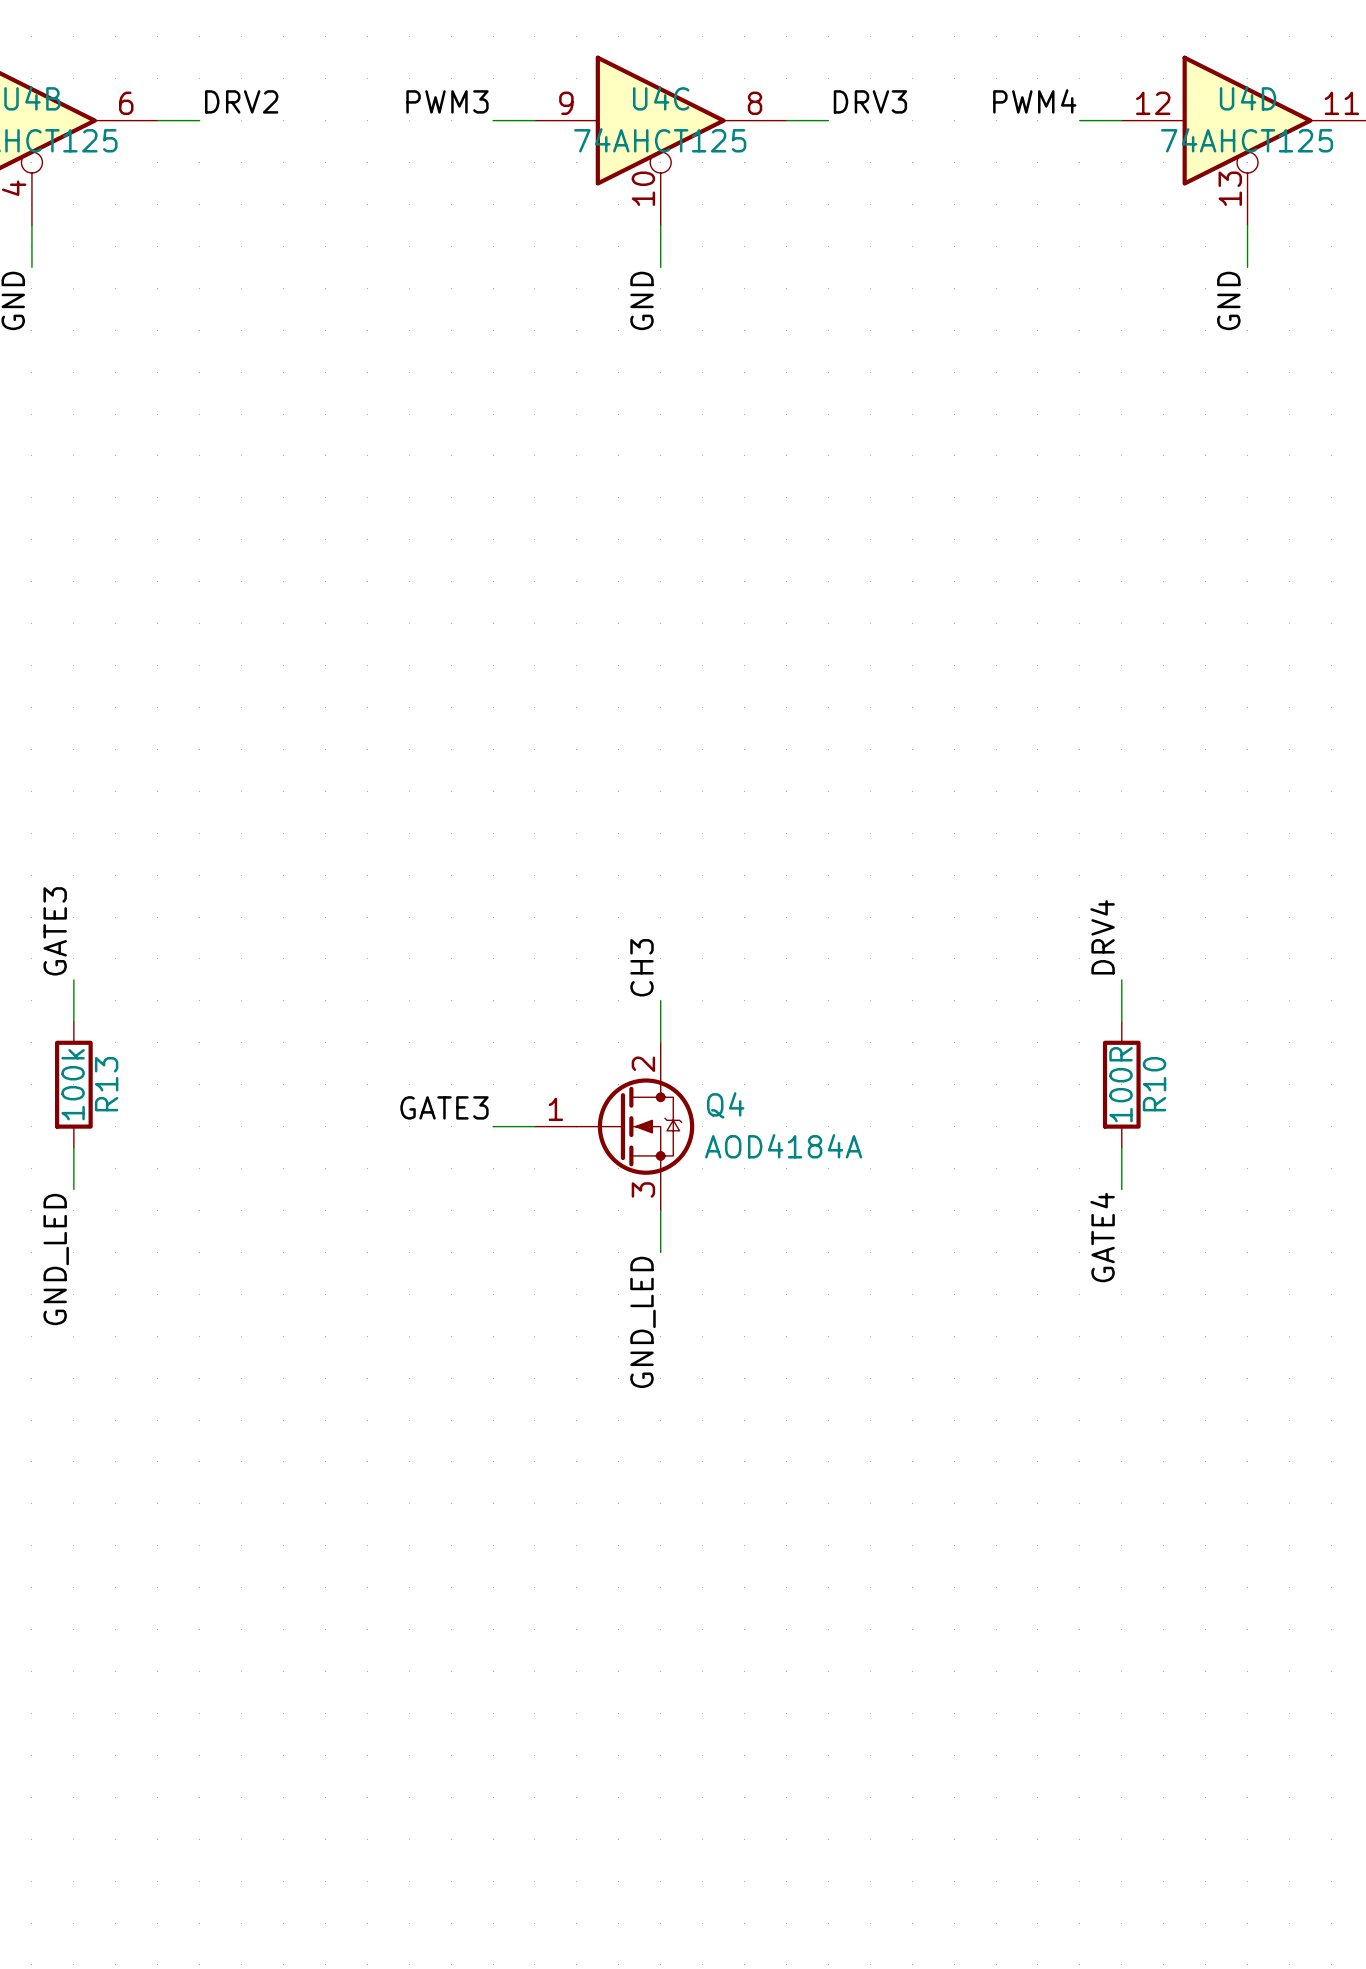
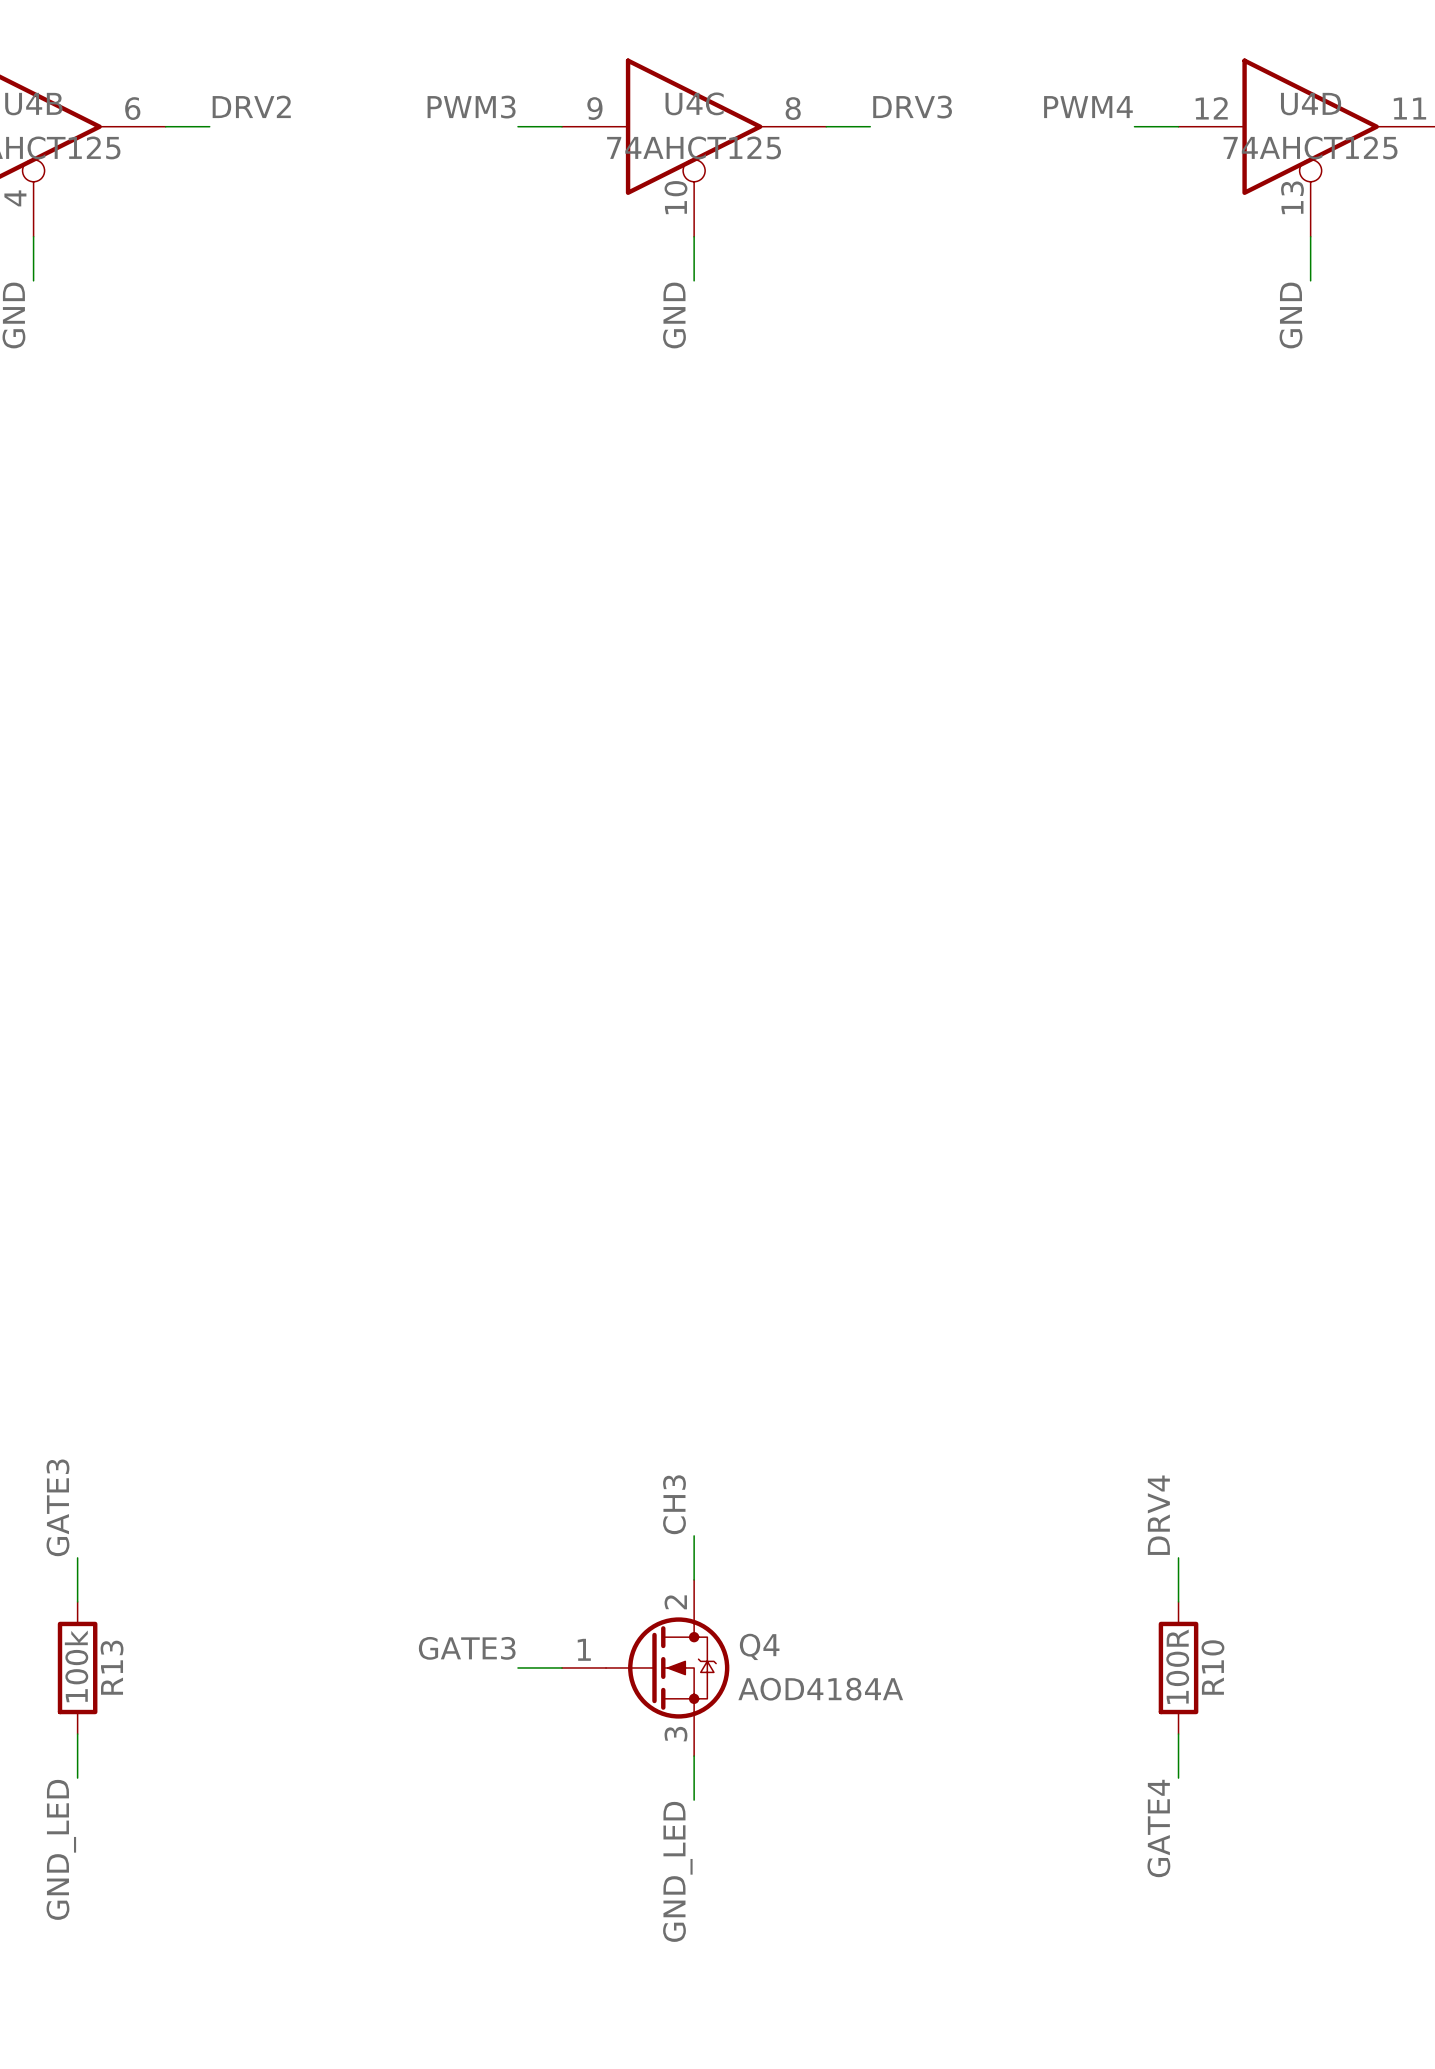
label: GATE3 (55, 931) -> none
label: DRV4 (1102, 937) -> none
label: CH3 (642, 967) -> none
wire: (73, 979) (73, 1021) -> none
wire: (1121, 979) (1121, 1021) -> none
wire: (660, 1000) (660, 1042) -> none
R13 position: (73, 1084) -> (77, 1667)
R10 position: (1121, 1084) -> (1178, 1667)
label: GATE3 (444, 1107) -> none
wire: (493, 1126) (534, 1126) -> none
Q4 position: (614, 1126) -> (645, 1667)
wire: (73, 1147) (73, 1189) -> (77, 1557) (77, 1601)
wire: (1121, 1147) (1121, 1189) -> (1178, 1557) (1178, 1601)
wire: (660, 1210) (660, 1252) -> (694, 1535) (694, 1579)
label: GATE4 (1102, 1237) -> none
label: GND_LED (56, 1259) -> none
label: GND_LED (643, 1322) -> none
label: none -> CH3 (674, 1504)
label: none -> GATE3 (57, 1507)
label: none -> DRV4 (1158, 1515)
label: none -> GATE3 (467, 1648)
wire: none -> (517, 1667) (562, 1667)
wire: none -> (77, 1734) (77, 1778)
wire: none -> (1178, 1734) (1178, 1778)
wire: none -> (694, 1756) (694, 1800)
label: none -> GATE4 (1158, 1828)
label: none -> GND_LED (61, 1849)
label: none -> GND_LED (677, 1871)

